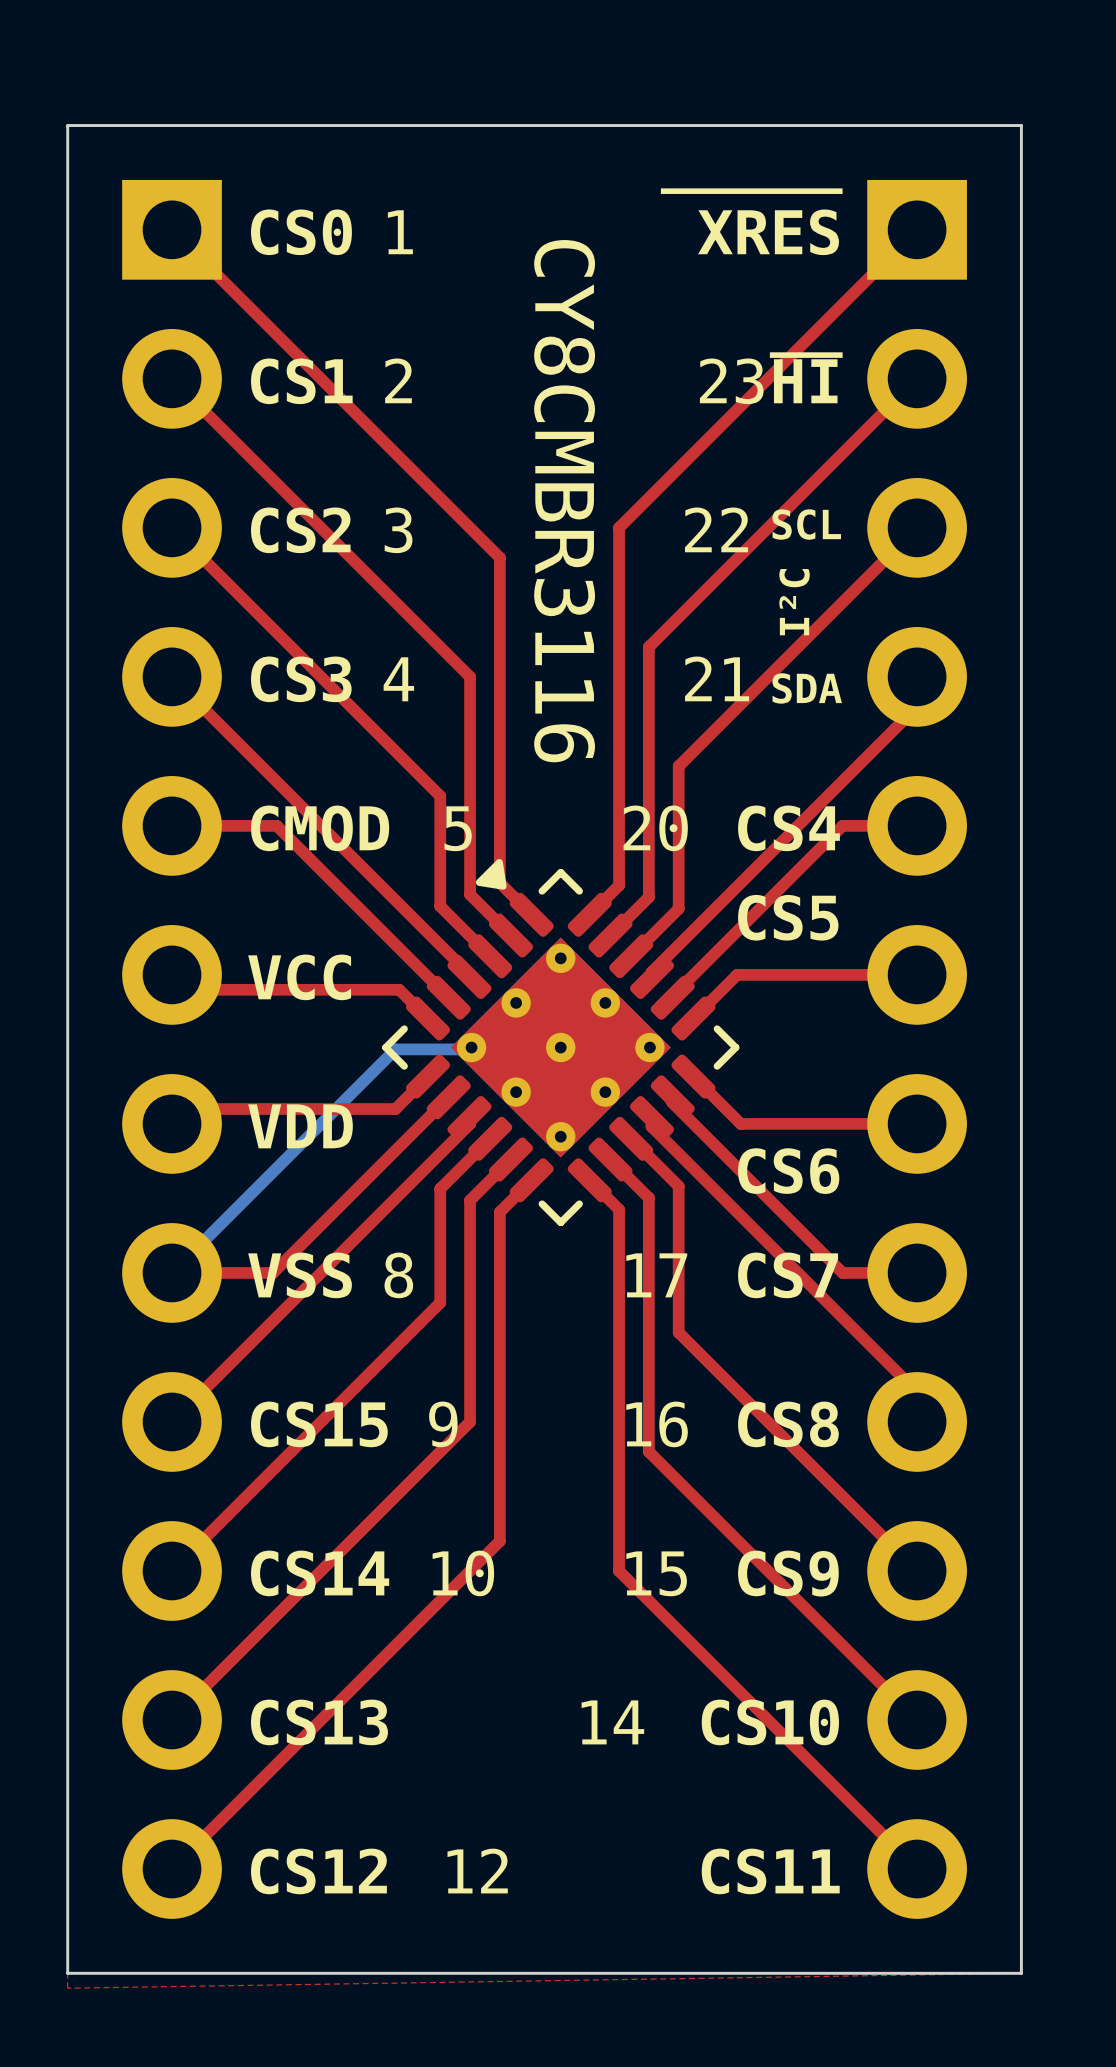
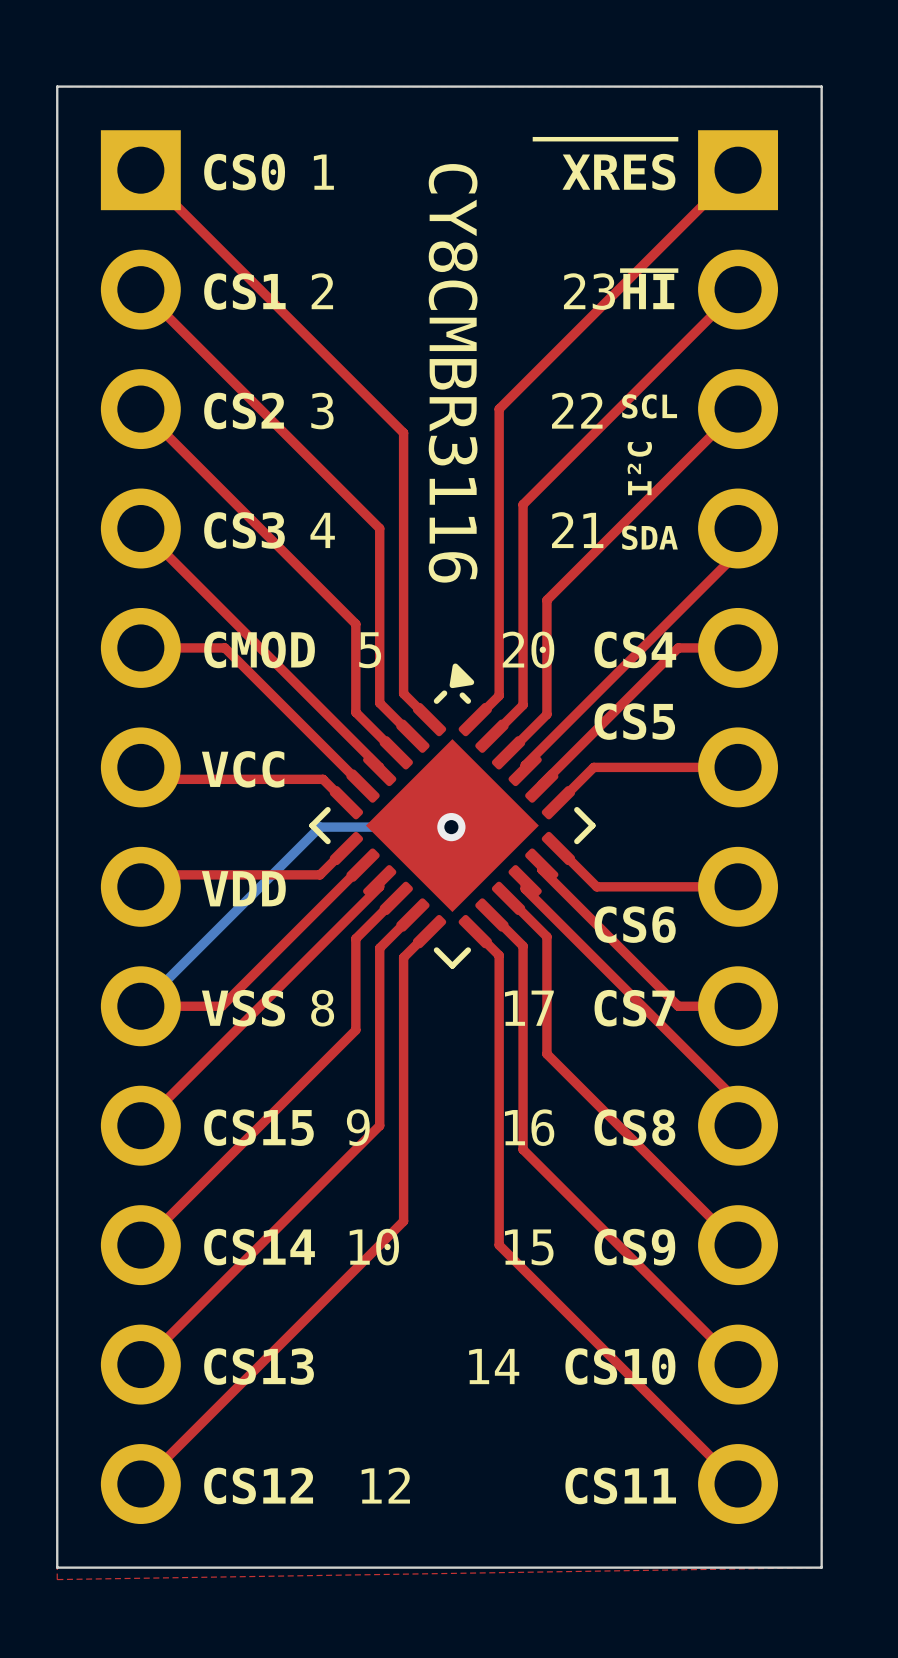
CY8CMBR3116 footprint: [382, 858, 740, 1227] -> [309, 663, 596, 969]
via: none -> (451, 827)

